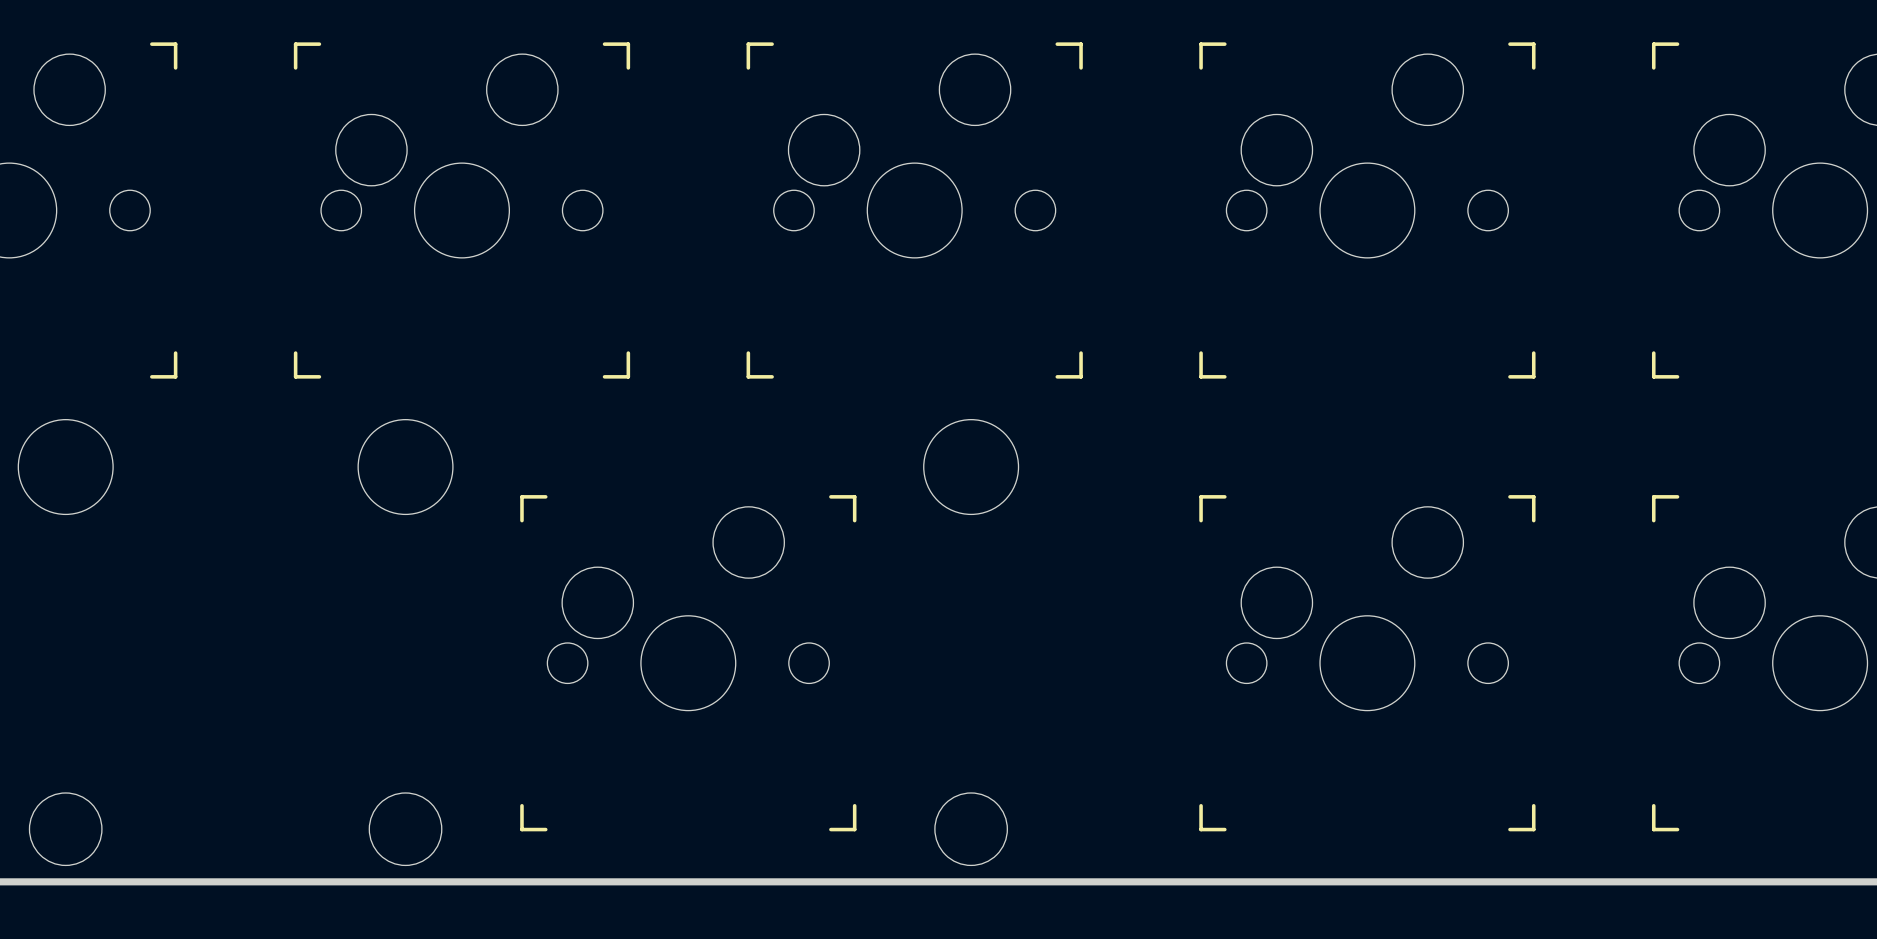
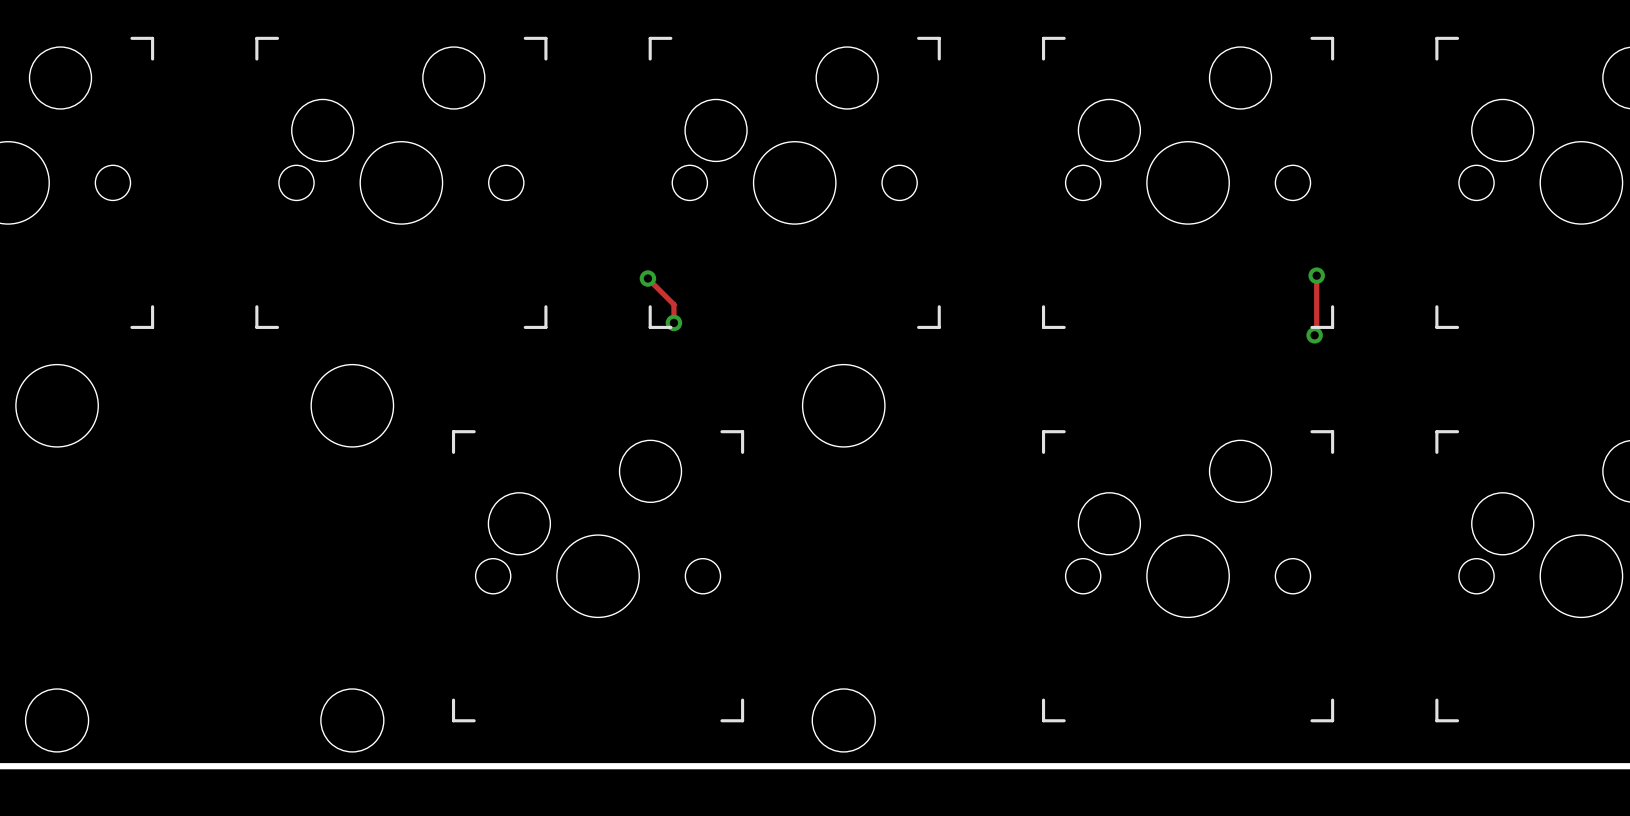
track: none -> (1316, 275) (1316, 333) (1314, 335)
via: none -> (1316, 275)
track: none -> (647, 278) (673, 304) (673, 322)
via: none -> (647, 278)
via: none -> (673, 322)
via: none -> (1314, 335)

